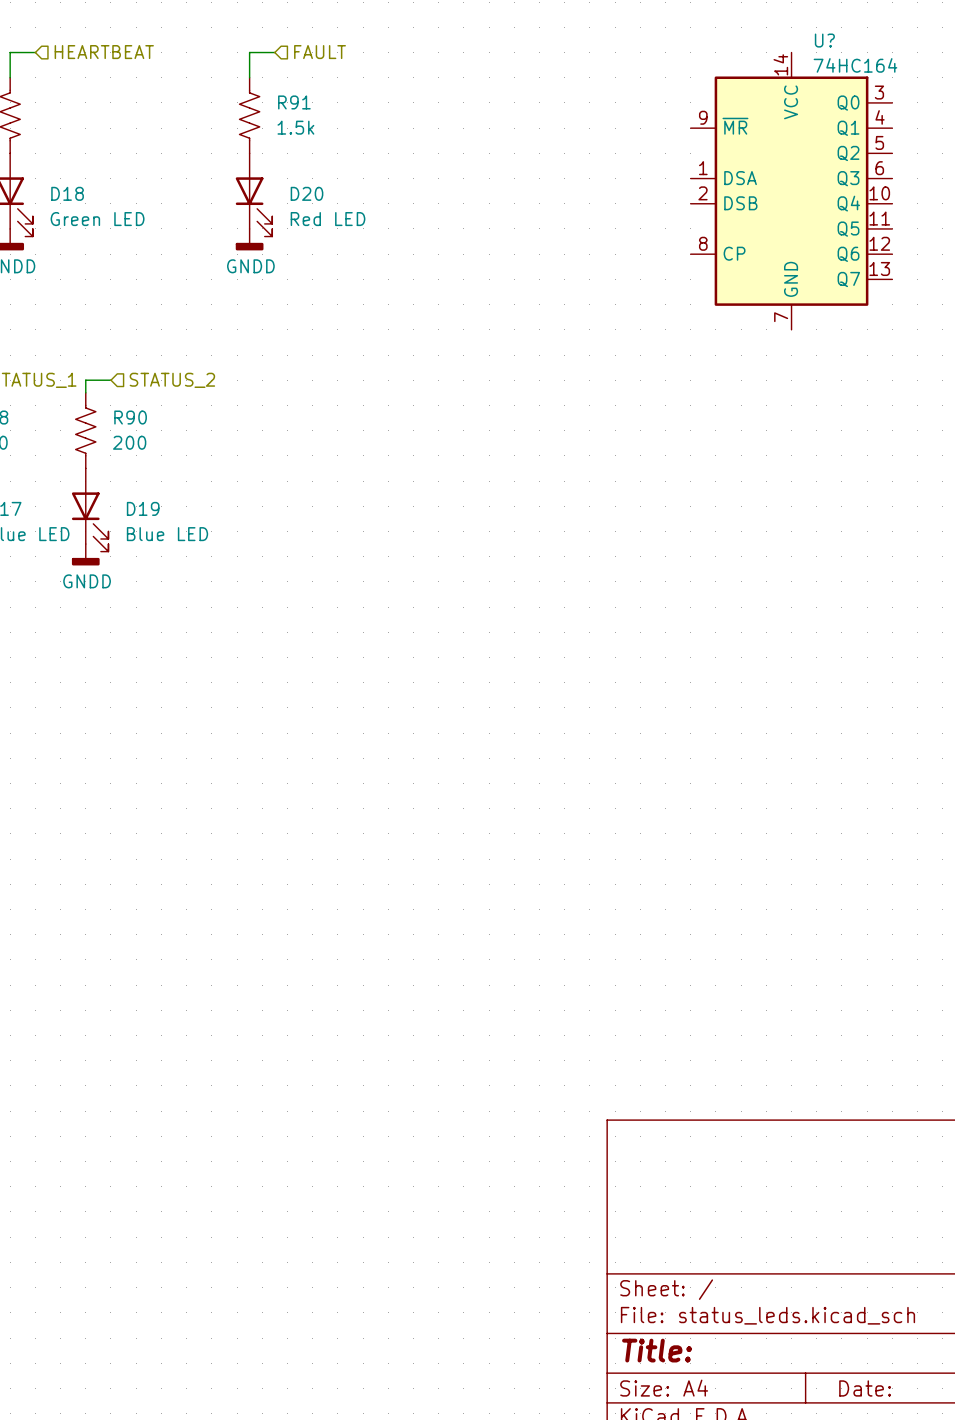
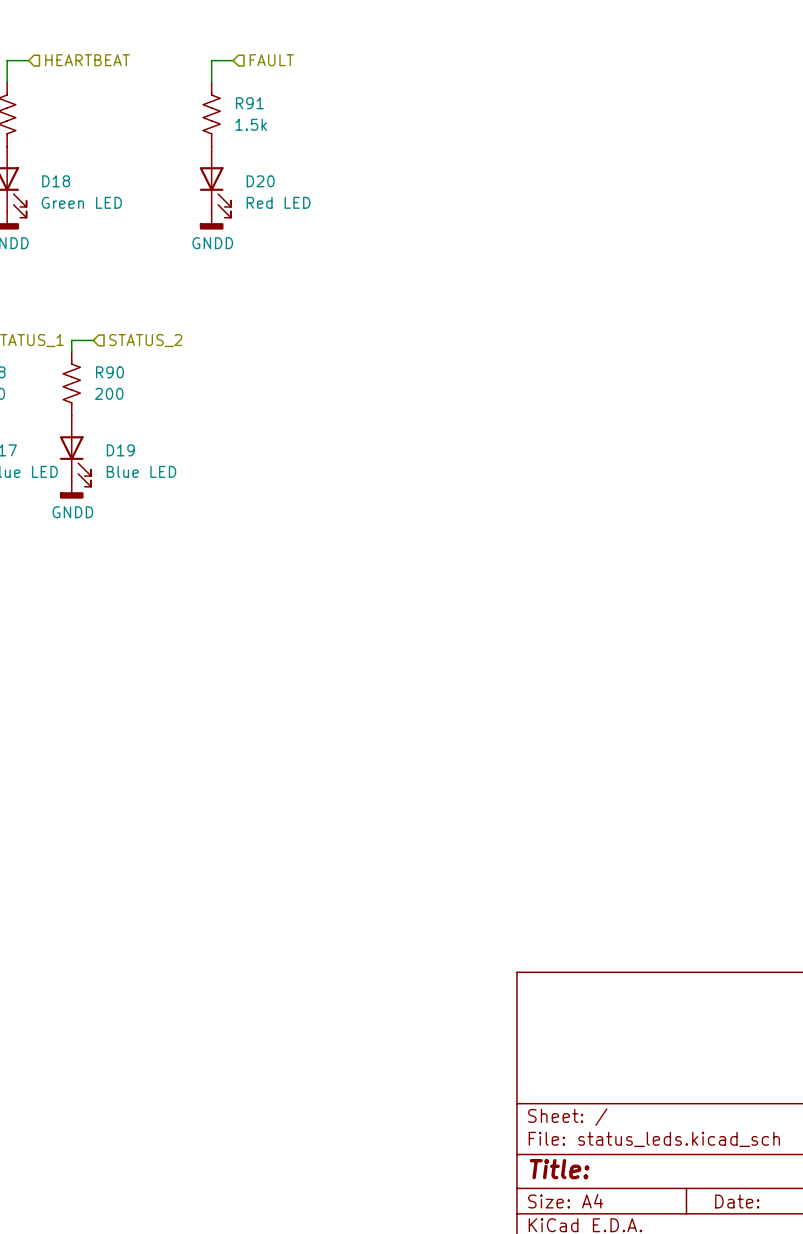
U?: 74HC164 (791, 191) -> none

